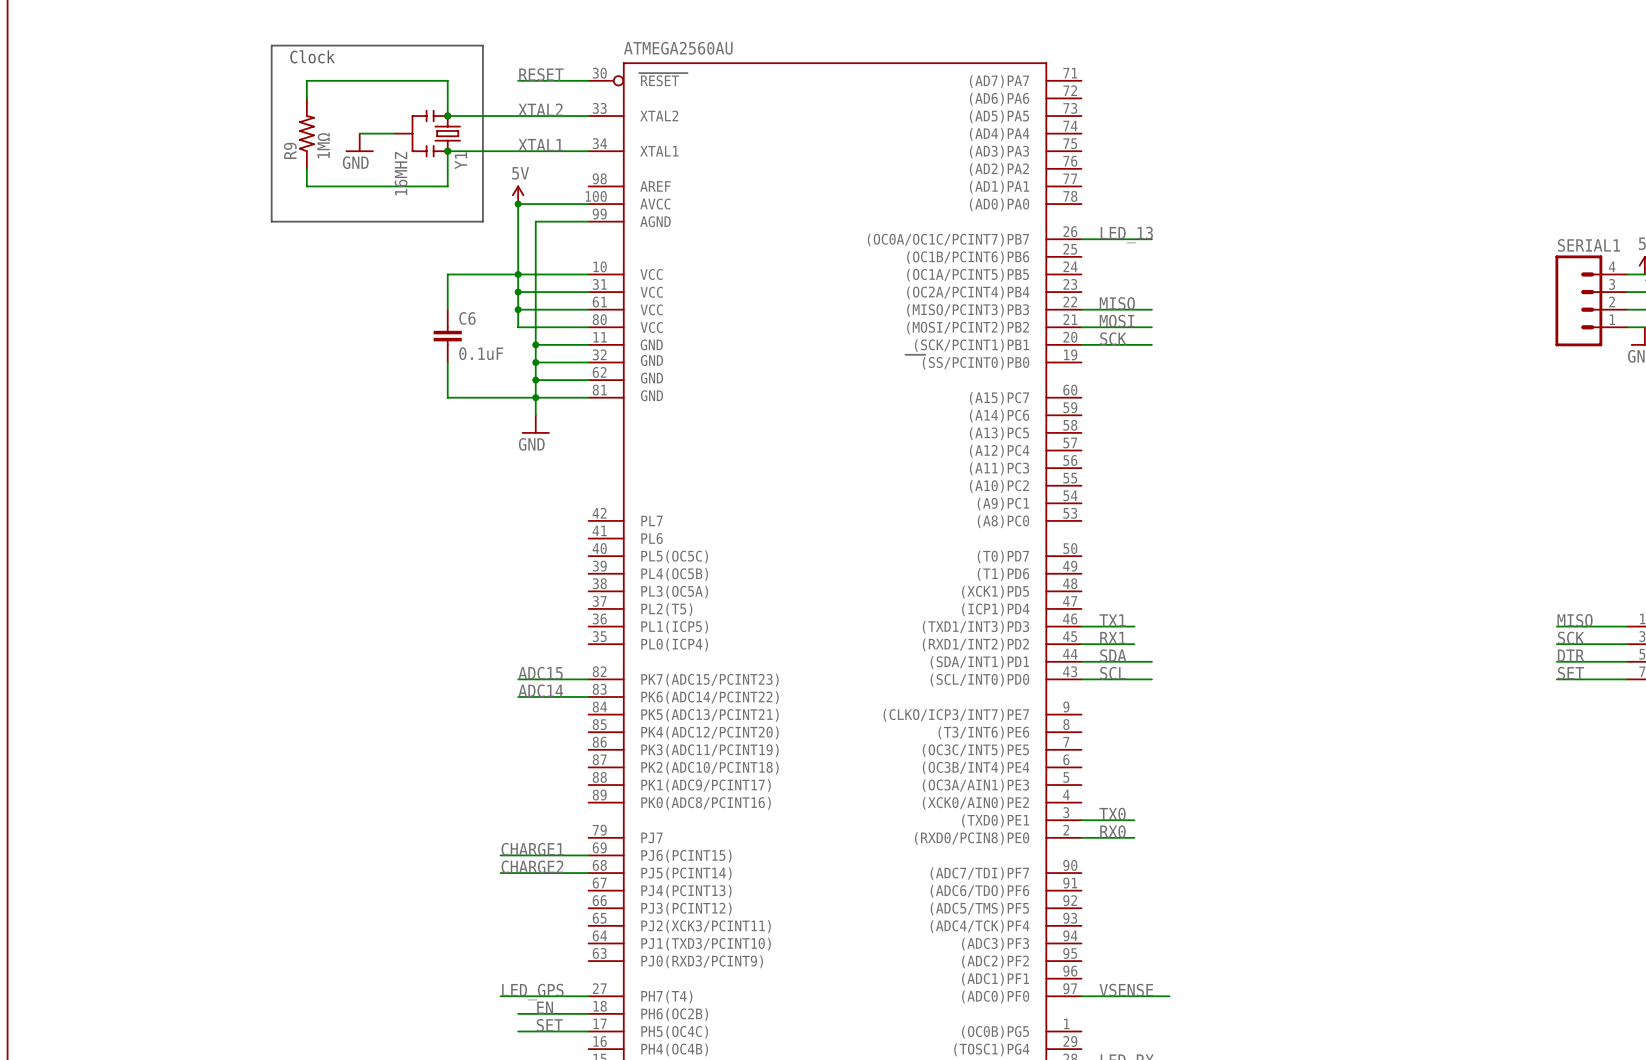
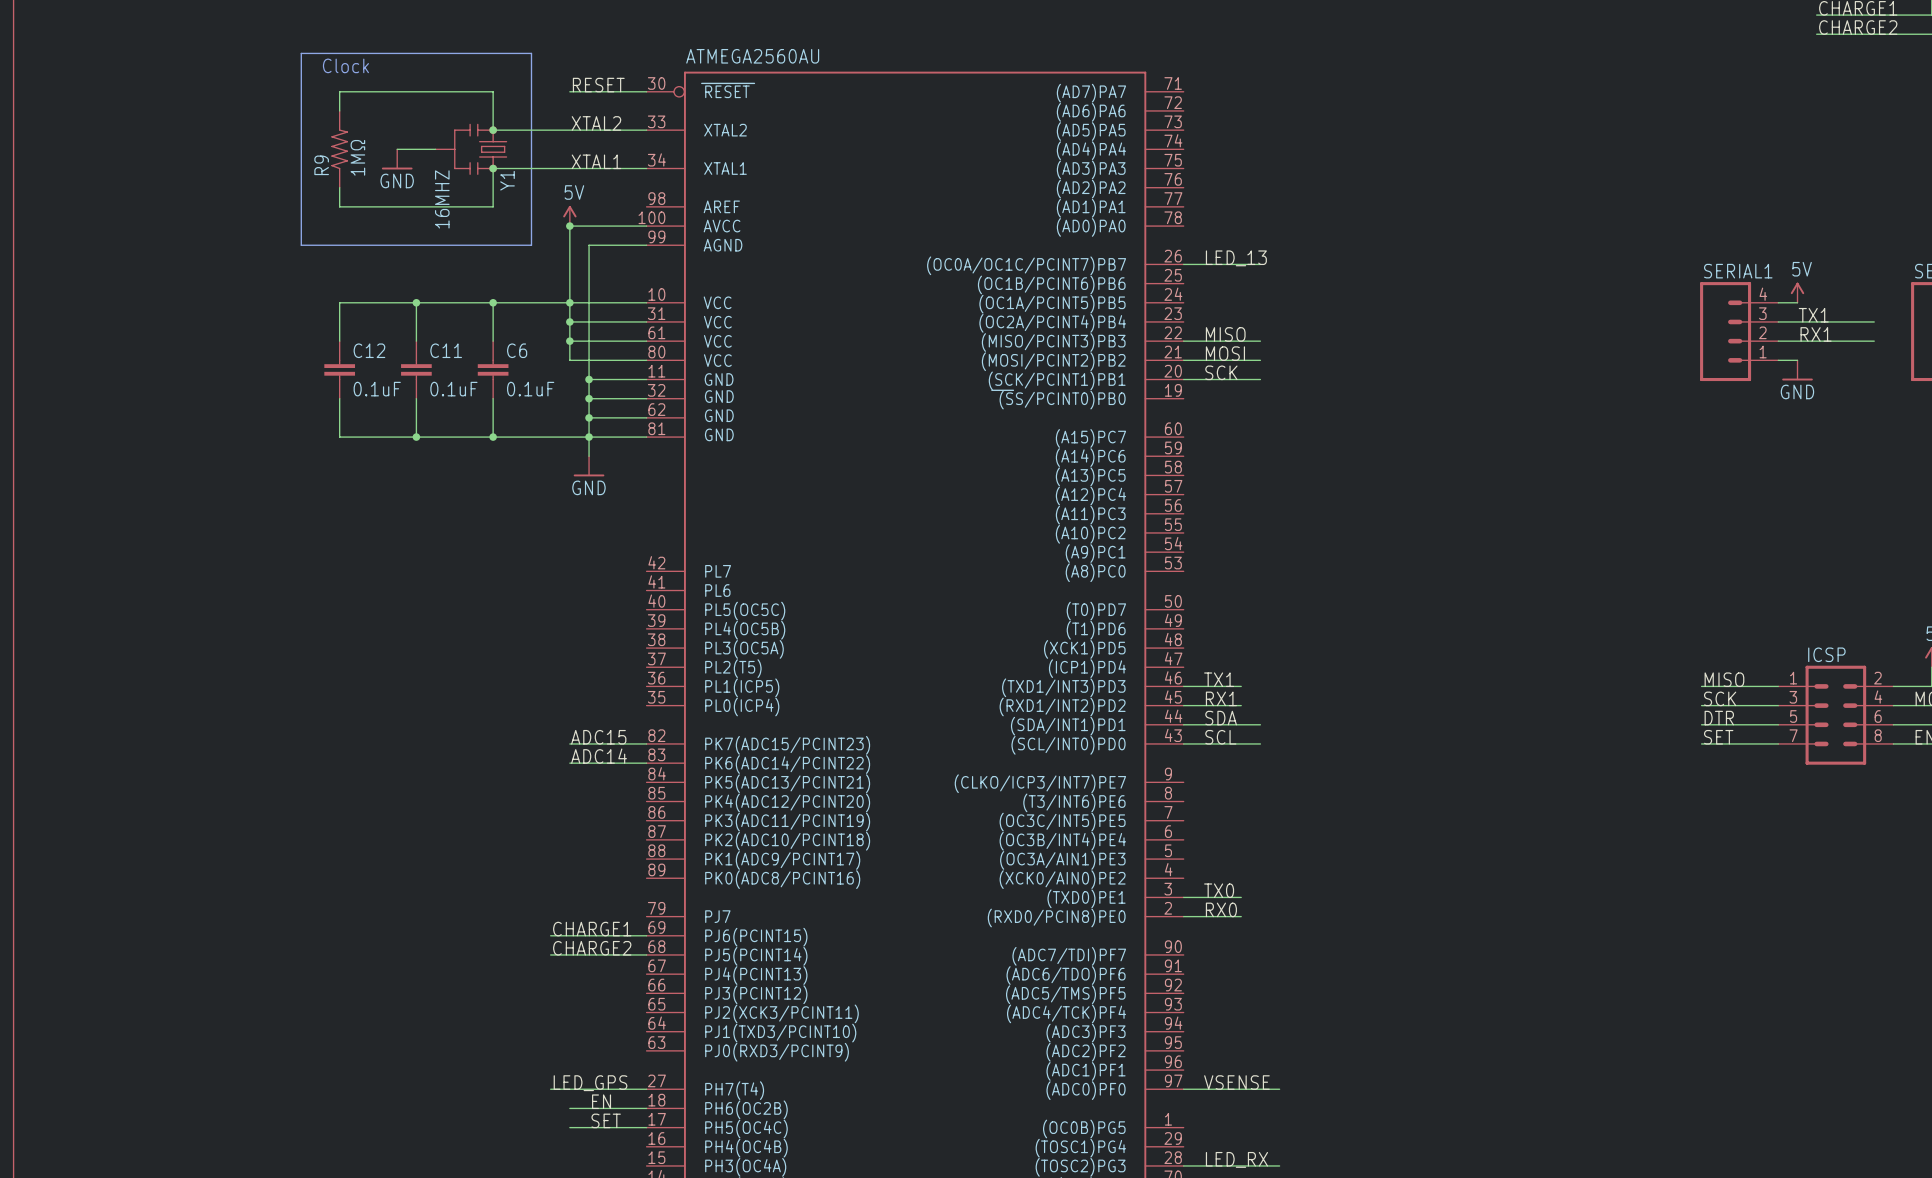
wire: none -> (416, 302) (416, 341)
junction: none -> (416, 302)
wire: none -> (493, 302) (339, 302) (339, 341)
junction: none -> (493, 302)
C12: none -> 0.1uF (339, 369)
C11: none -> 0.1uF (416, 369)
wire: none -> (339, 398) (339, 437) (493, 437)
wire: none -> (416, 398) (416, 437)
junction: none -> (416, 437)
junction: none -> (493, 437)

